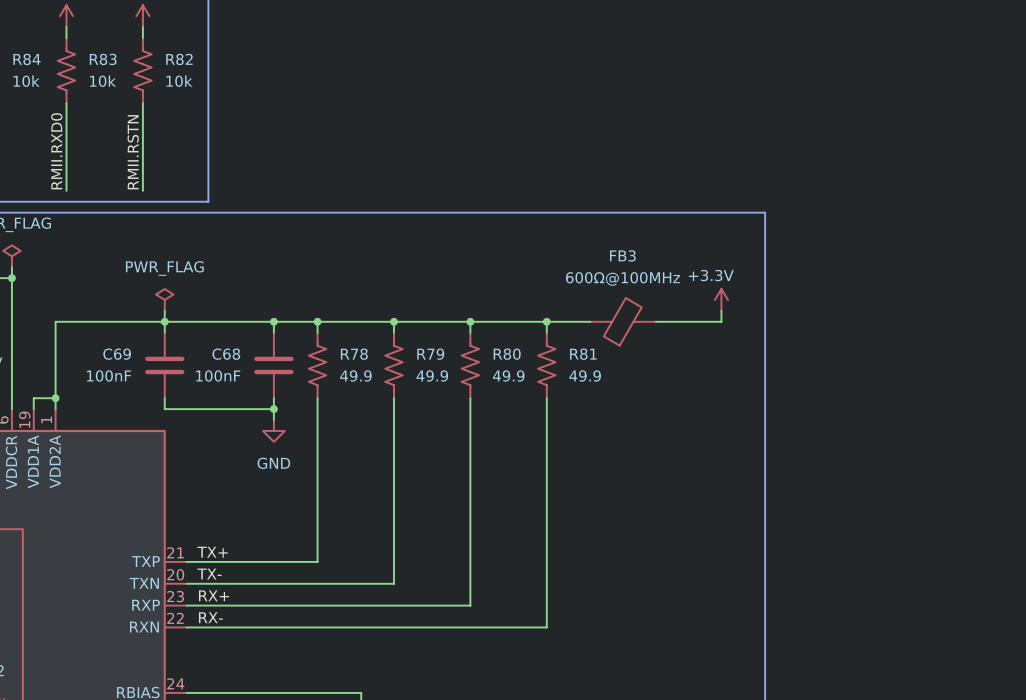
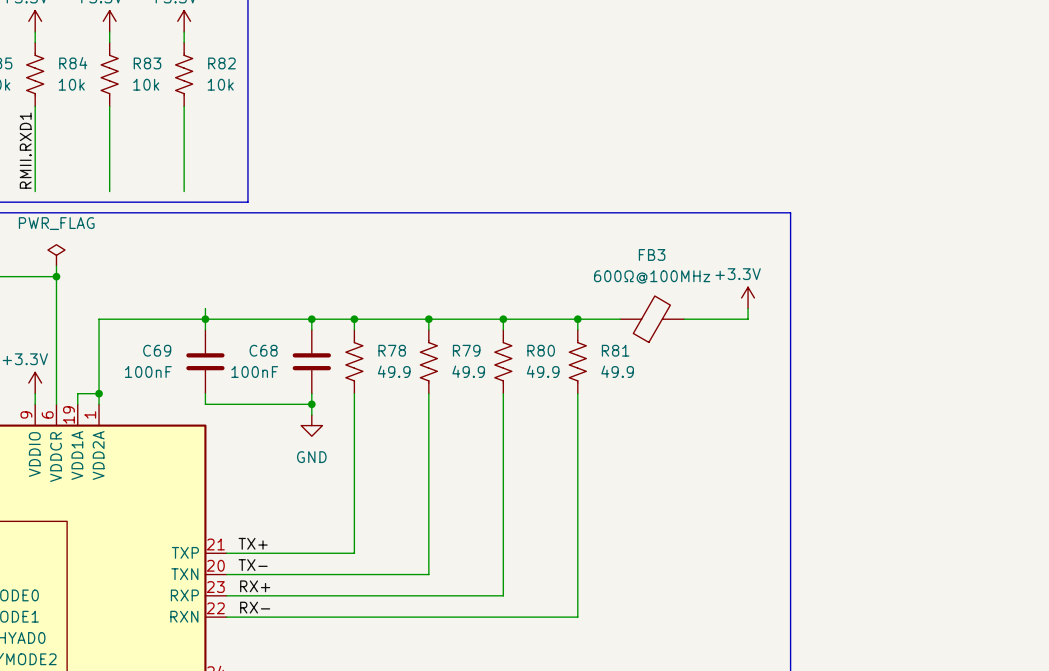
label: RMII.RXD0 (56, 151) -> none
label: RMII.RSTN (133, 152) -> none
power symbol: PWR_FLAG (164, 299) -> none

